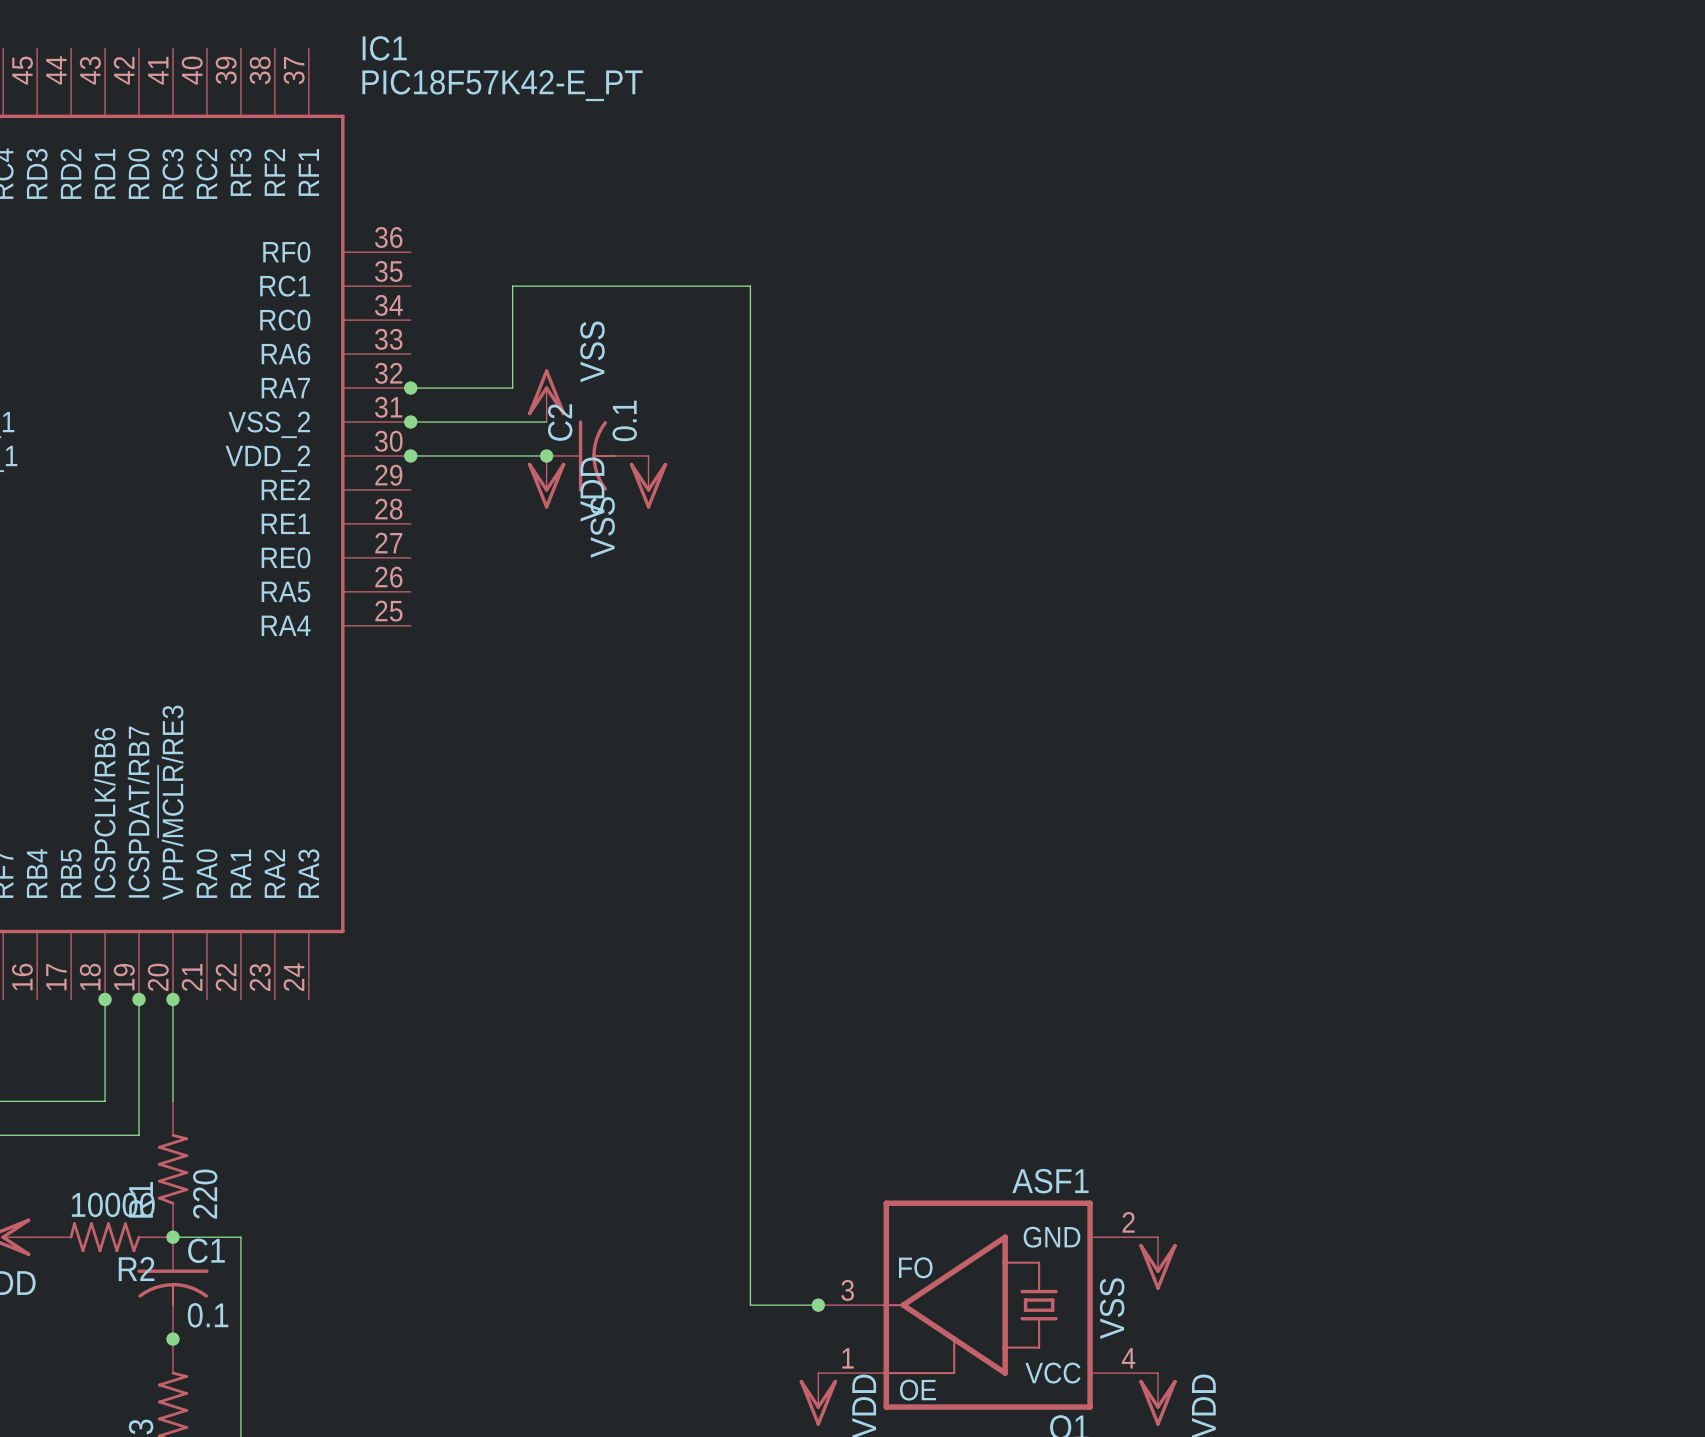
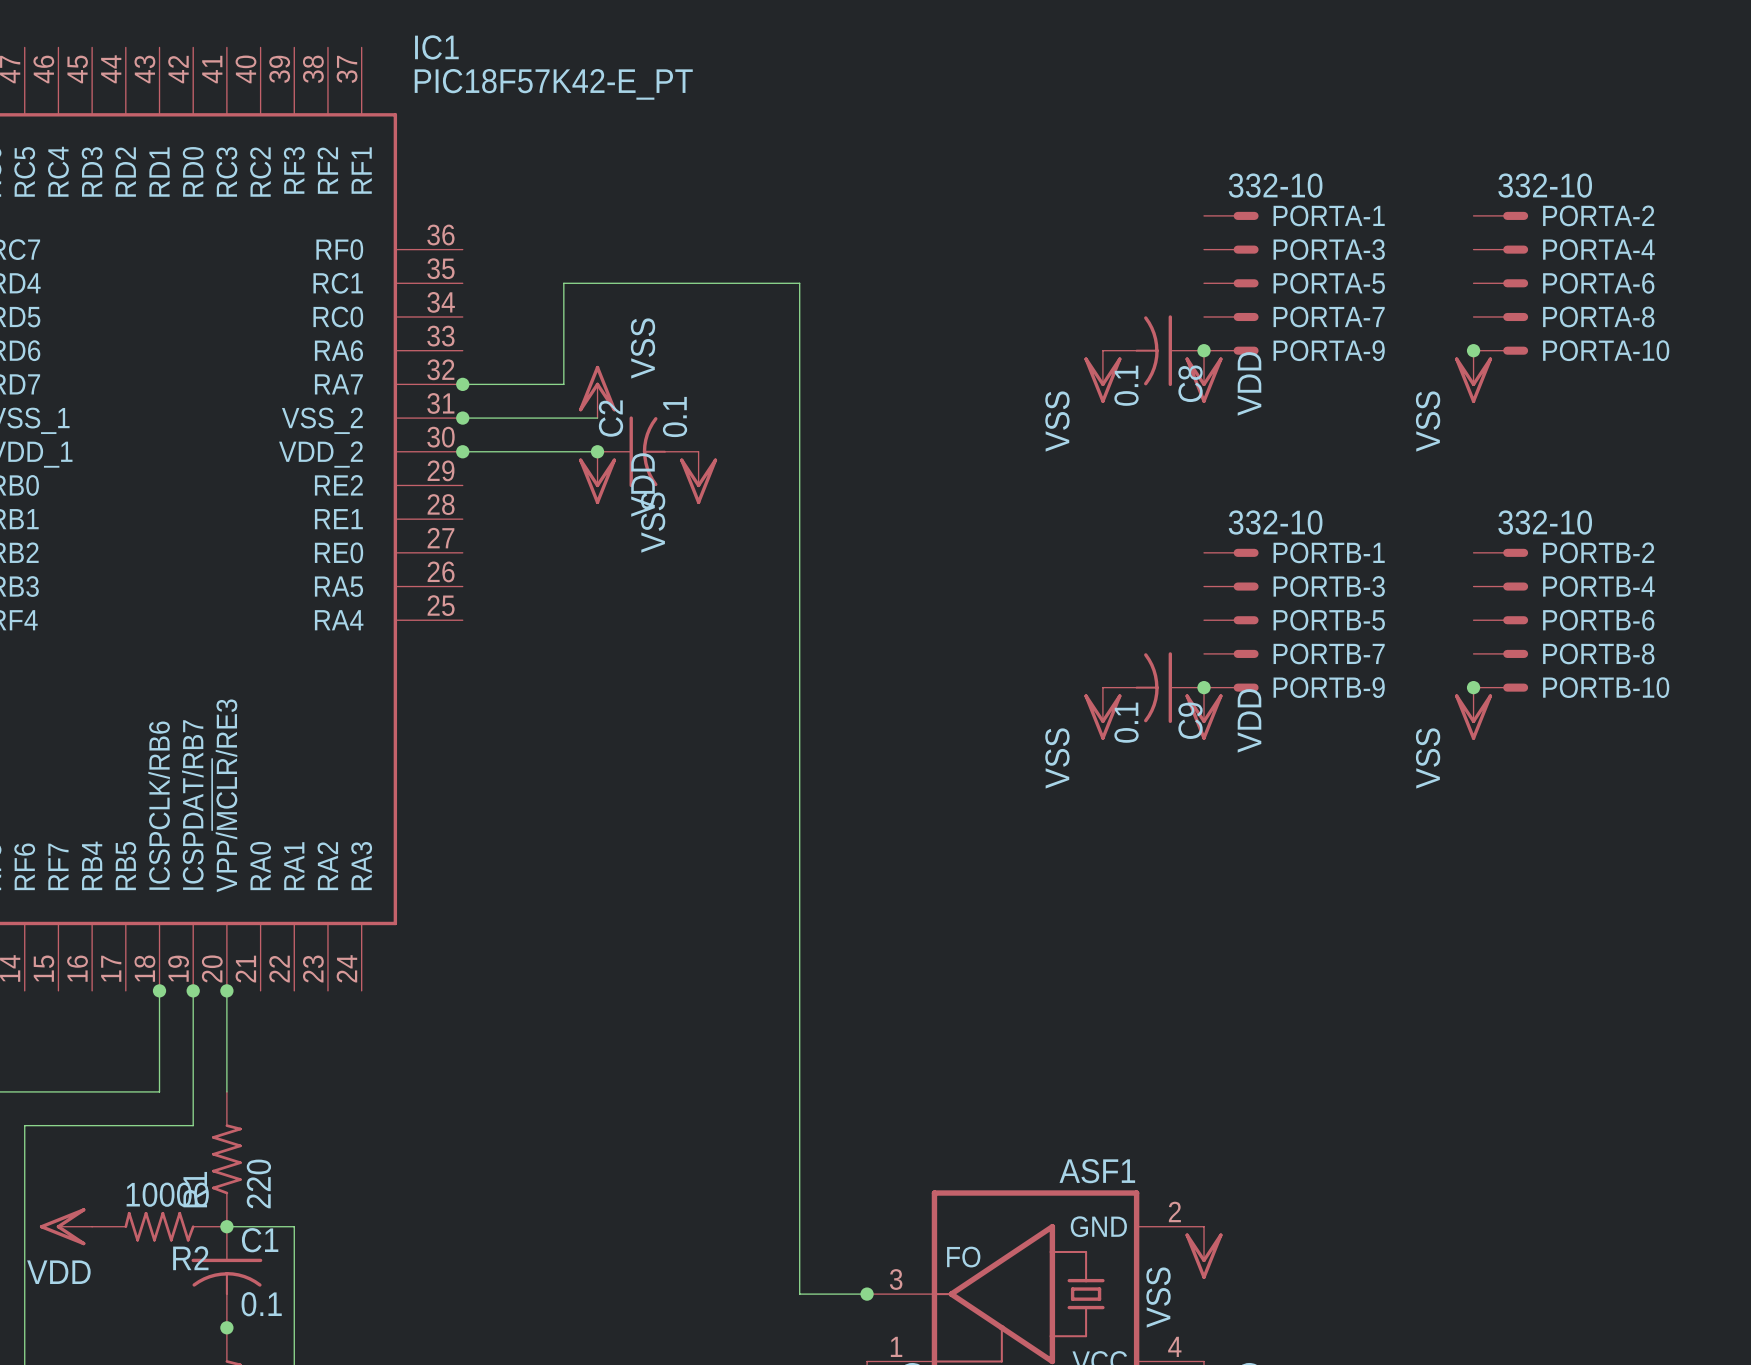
PORTA-1: none -> 332-10 (1231, 215)
PORTA-2: none -> 332-10 (1500, 215)
PORTA-3: none -> (1231, 249)
PORTA-4: none -> (1500, 249)
PORTA-5: none -> (1231, 283)
PORTA-6: none -> (1500, 283)
PORTA-7: none -> (1231, 316)
PORTA-8: none -> (1500, 316)
C8: none -> 0.1 (1153, 350)
junction: none -> (1204, 350)
PORTA-9: none -> (1231, 350)
junction: none -> (1473, 350)
PORTA-10: none -> (1500, 350)
power symbol: none -> VSS (1102, 376)
power symbol: none -> VDD (1204, 376)
power symbol: none -> VSS (1473, 376)
PORTB-1: none -> 332-10 (1231, 552)
PORTB-2: none -> 332-10 (1500, 552)
PORTB-3: none -> (1231, 586)
PORTB-4: none -> (1500, 586)
PORTB-5: none -> (1231, 620)
PORTB-6: none -> (1500, 620)
PORTB-7: none -> (1231, 653)
PORTB-8: none -> (1500, 653)
C9: none -> 0.1 (1153, 687)
junction: none -> (1204, 687)
PORTB-9: none -> (1231, 687)
junction: none -> (1473, 687)
PORTB-10: none -> (1500, 687)
power symbol: none -> VSS (1102, 713)
power symbol: none -> VDD (1204, 713)
power symbol: none -> VSS (1473, 713)

